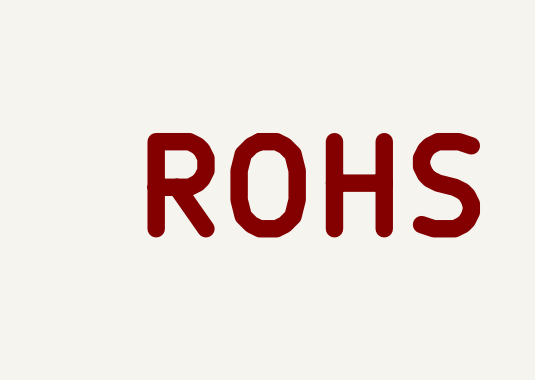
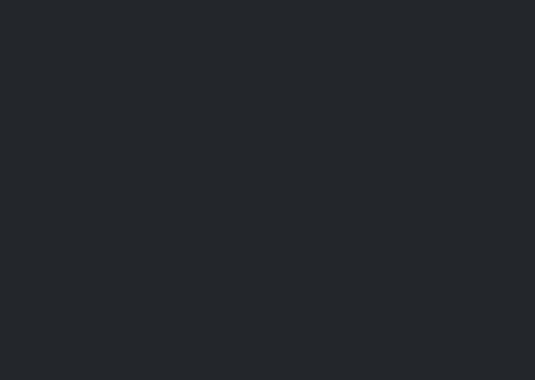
part: (313, 185) -> none

